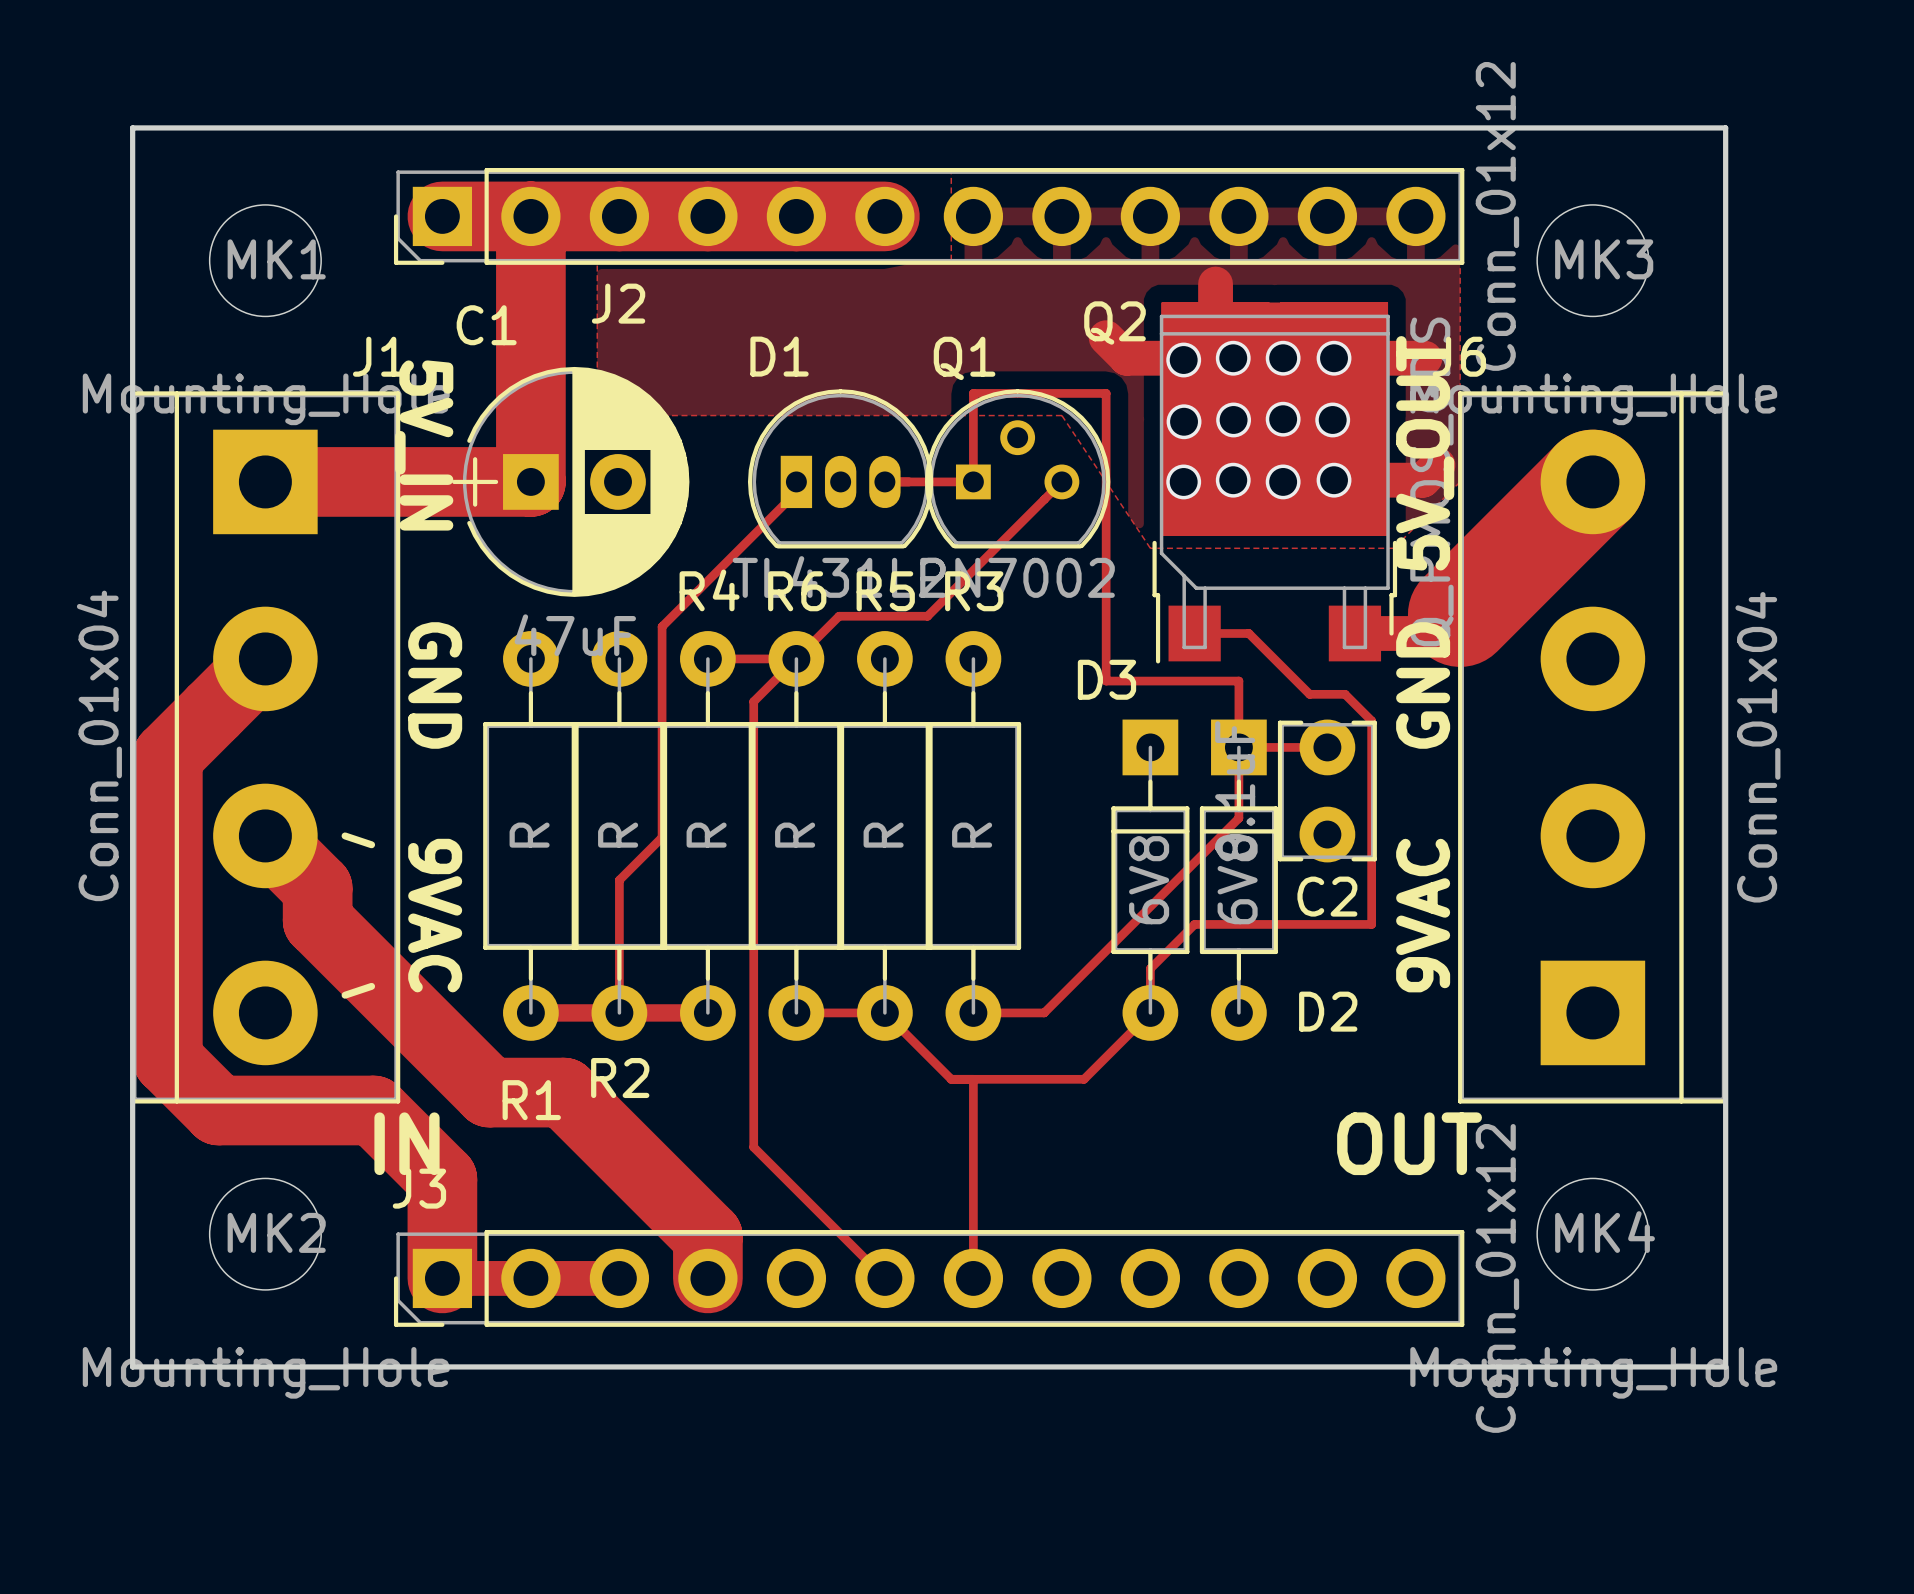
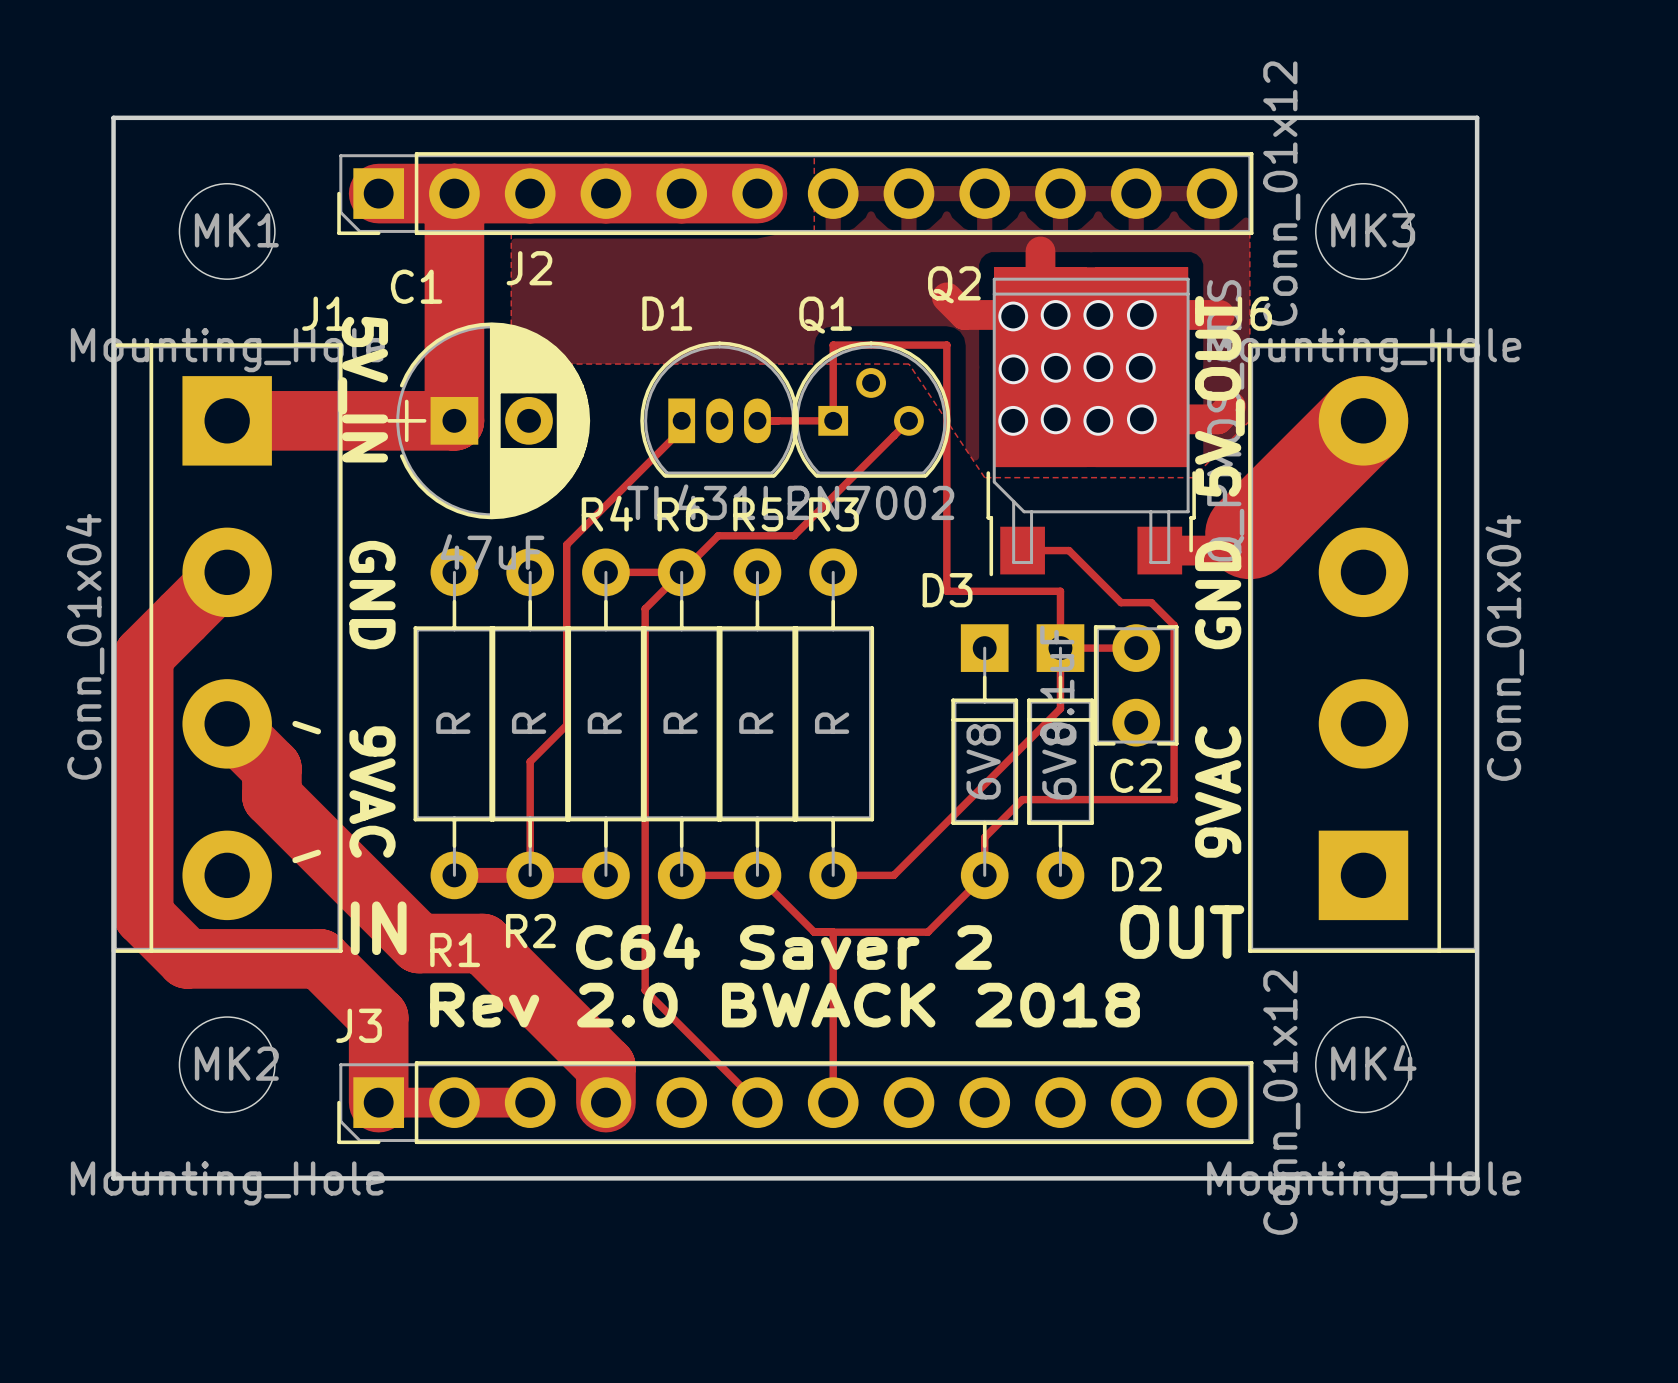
text: none -> C64 Saver 2 (783, 946)
text position: IN (407, 1143) -> IN (378, 928)
text position: OUT (1409, 1143) -> OUT (1182, 932)
text: none -> Rev 2.0 BWACK 2018 (785, 1005)

